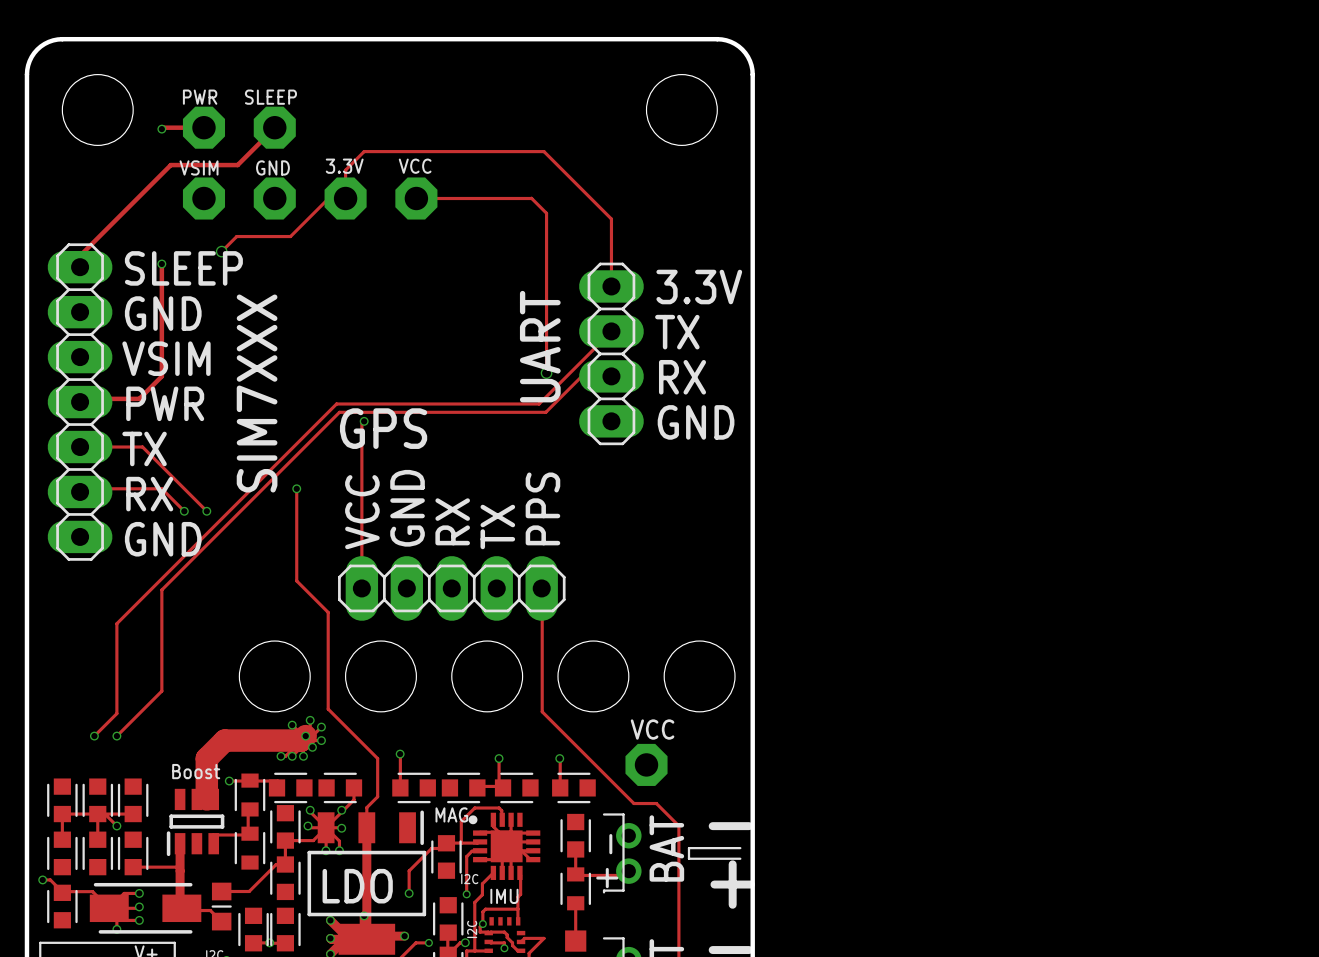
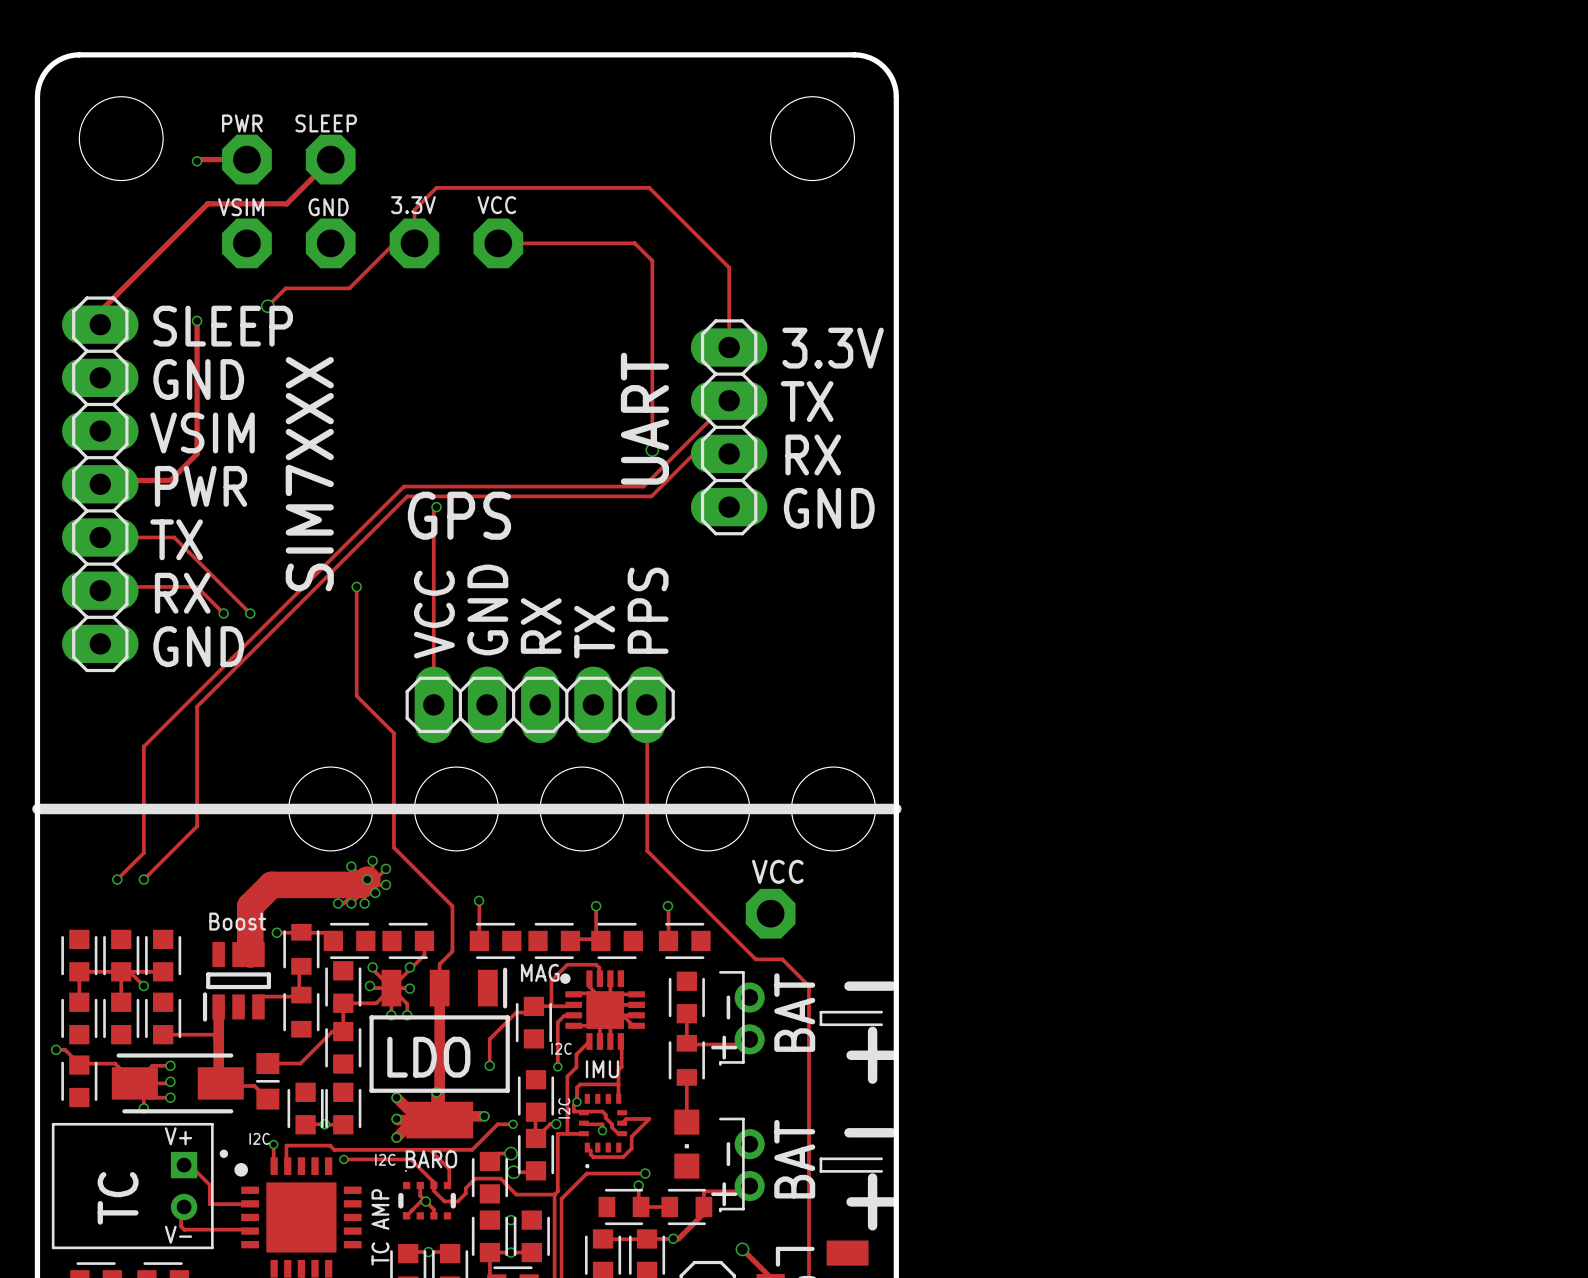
line: none -> (37, 808) (896, 808)

